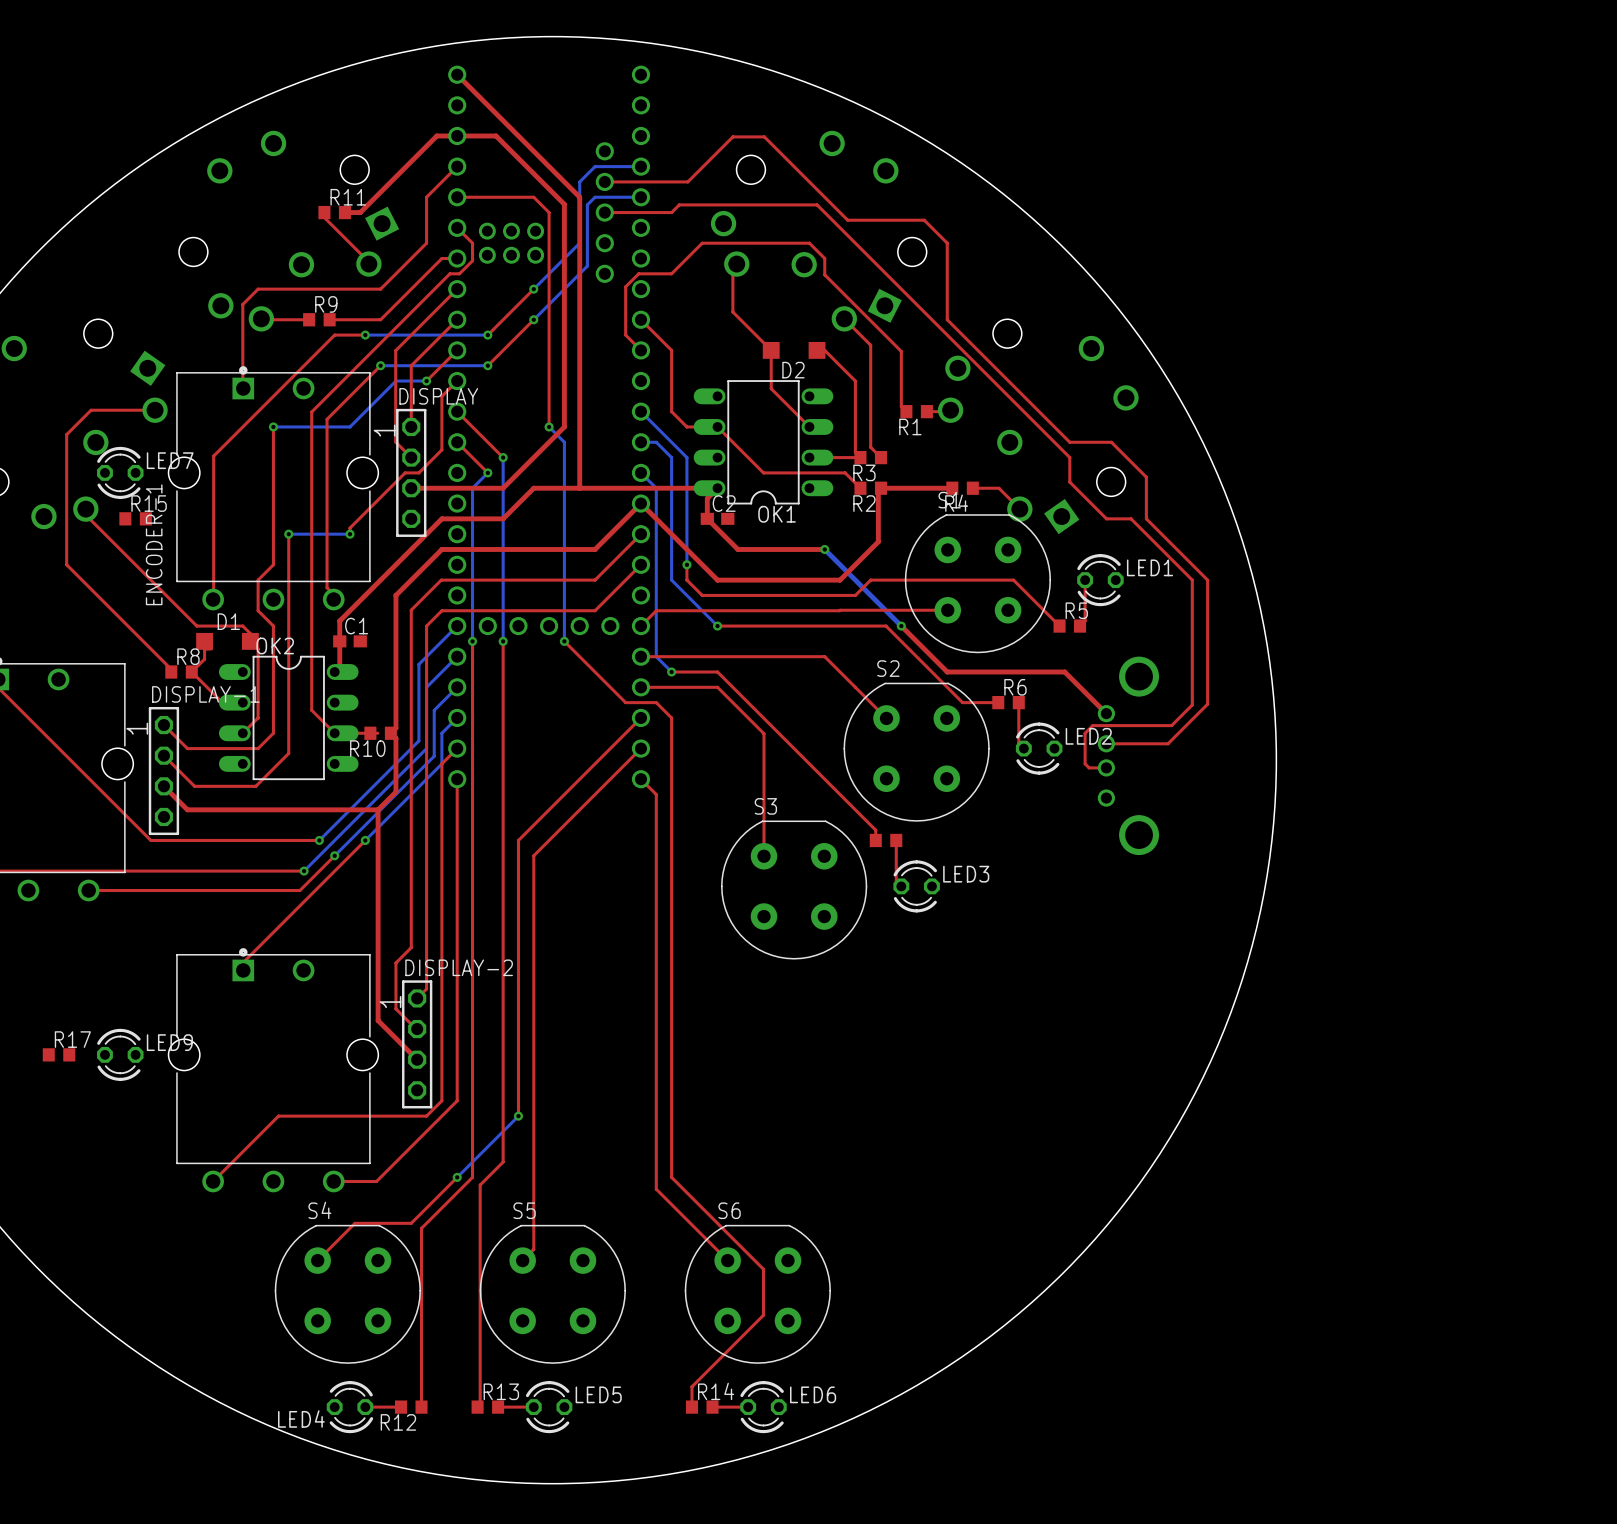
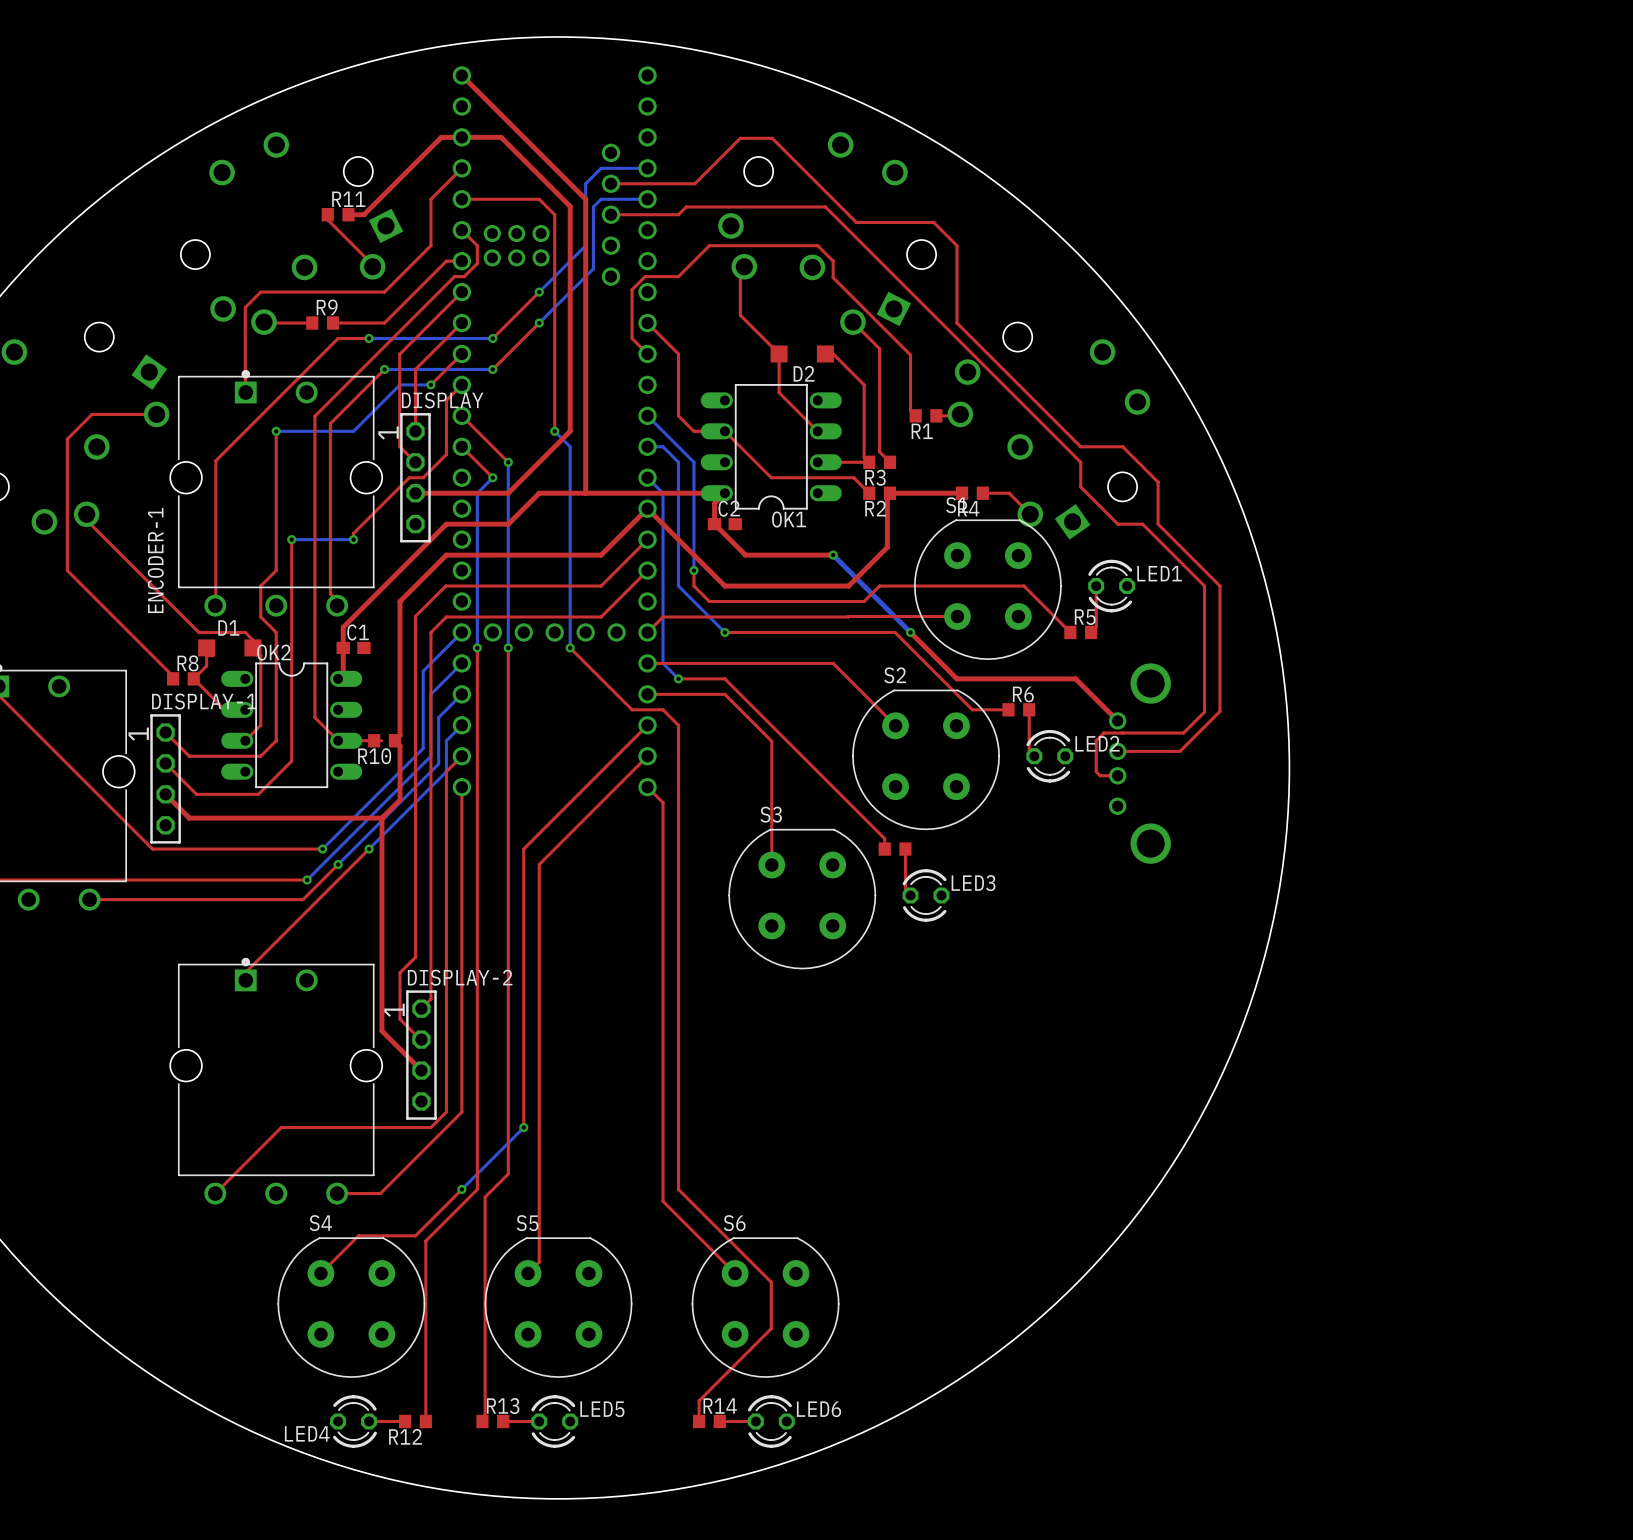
LED7: (120, 472) -> none
R15: (135, 518) -> none
R17: (59, 1054) -> none
LED9: (120, 1054) -> none

